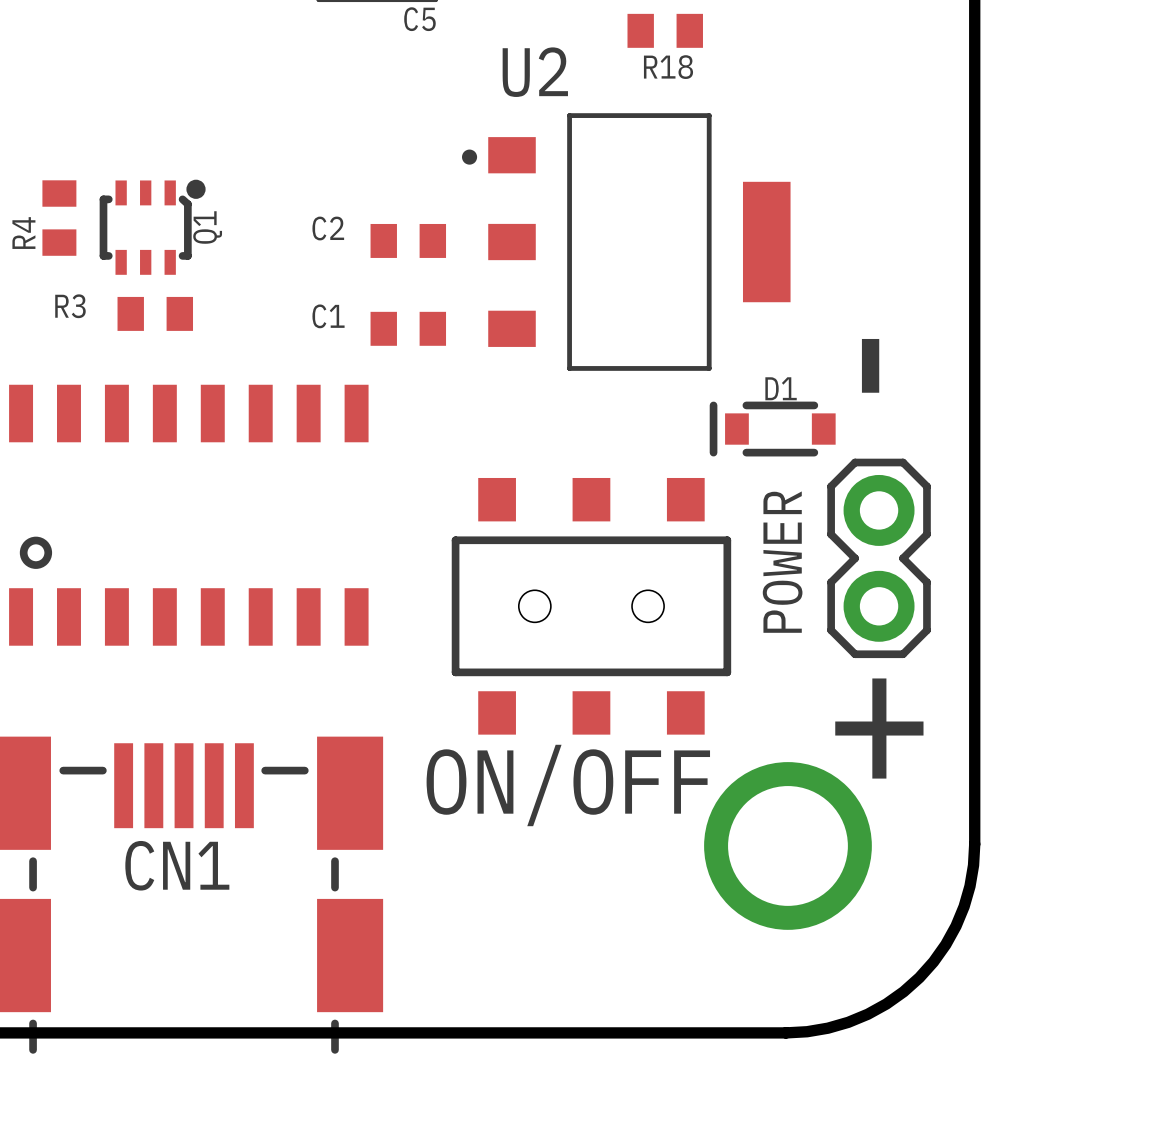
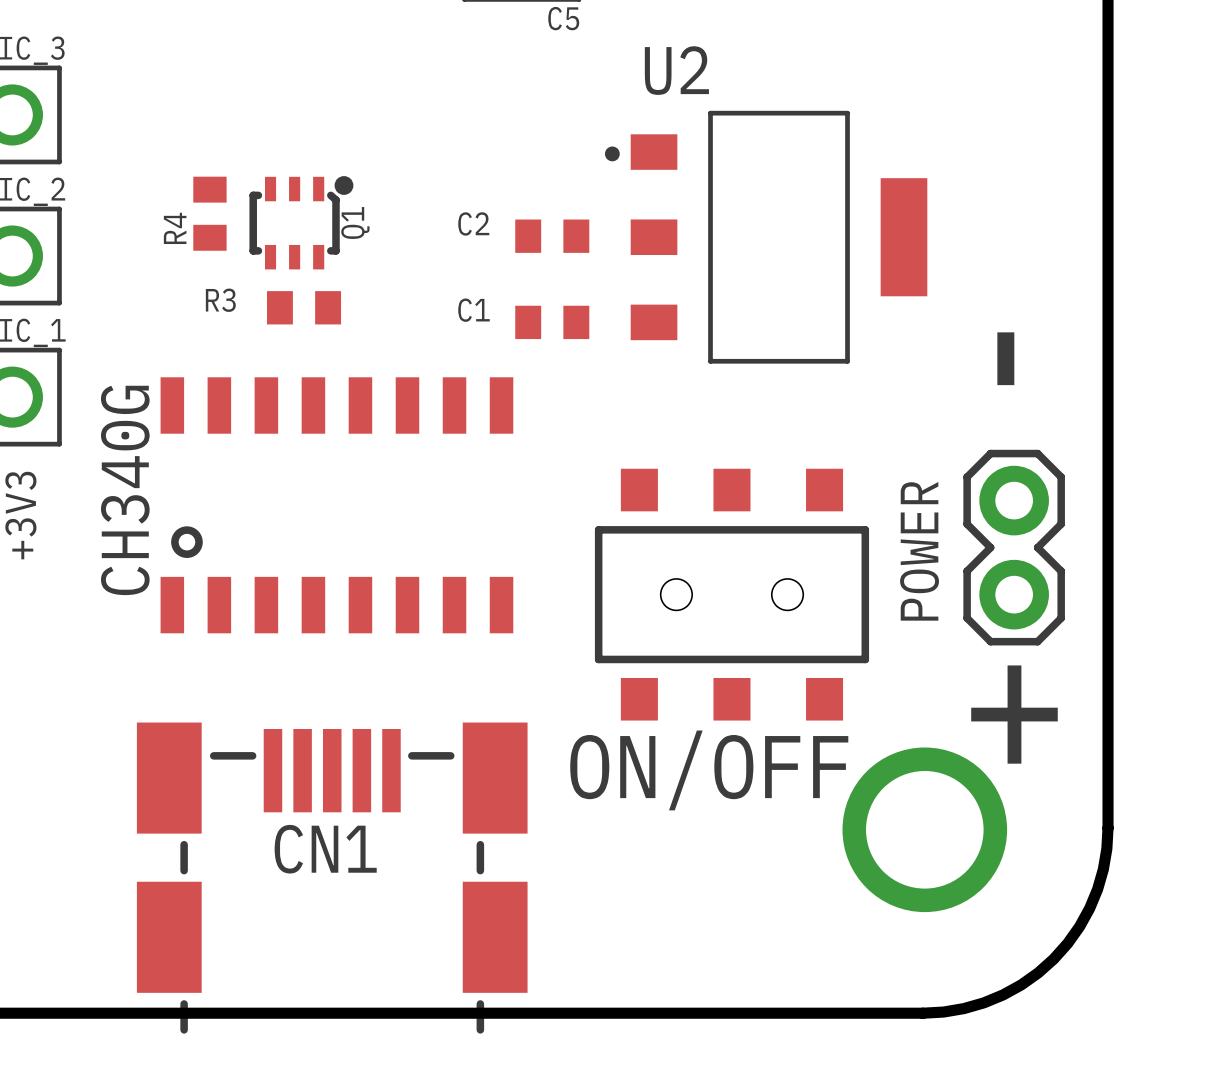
R18: (665, 30) -> none
D1: (772, 429) -> none

